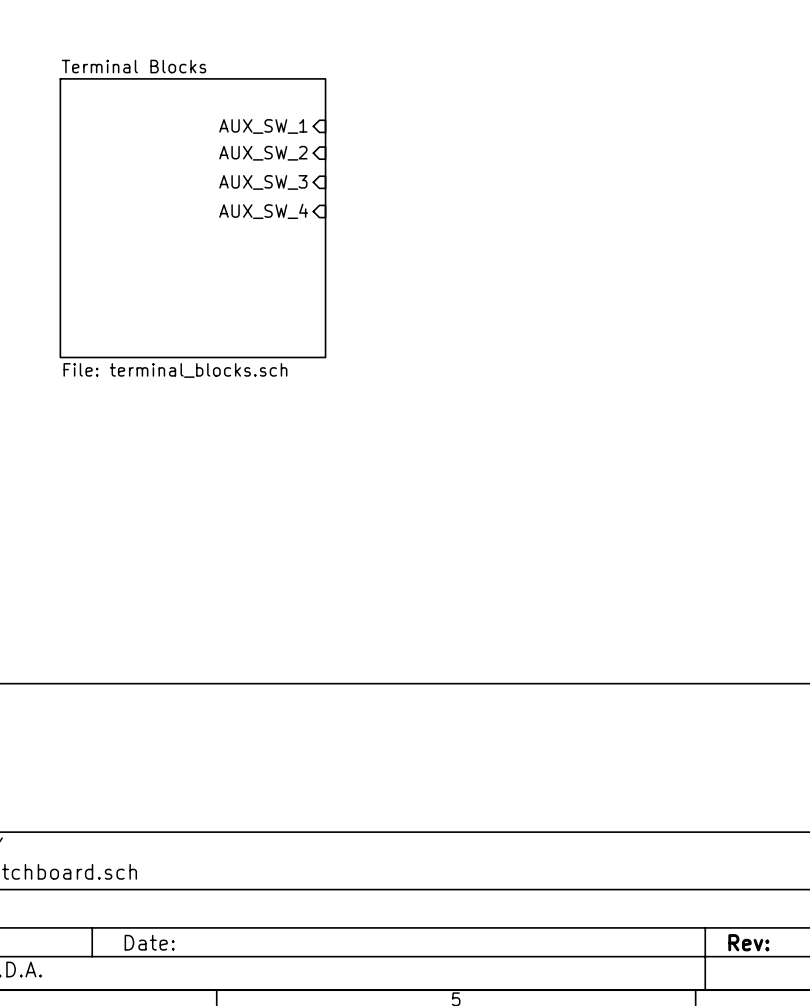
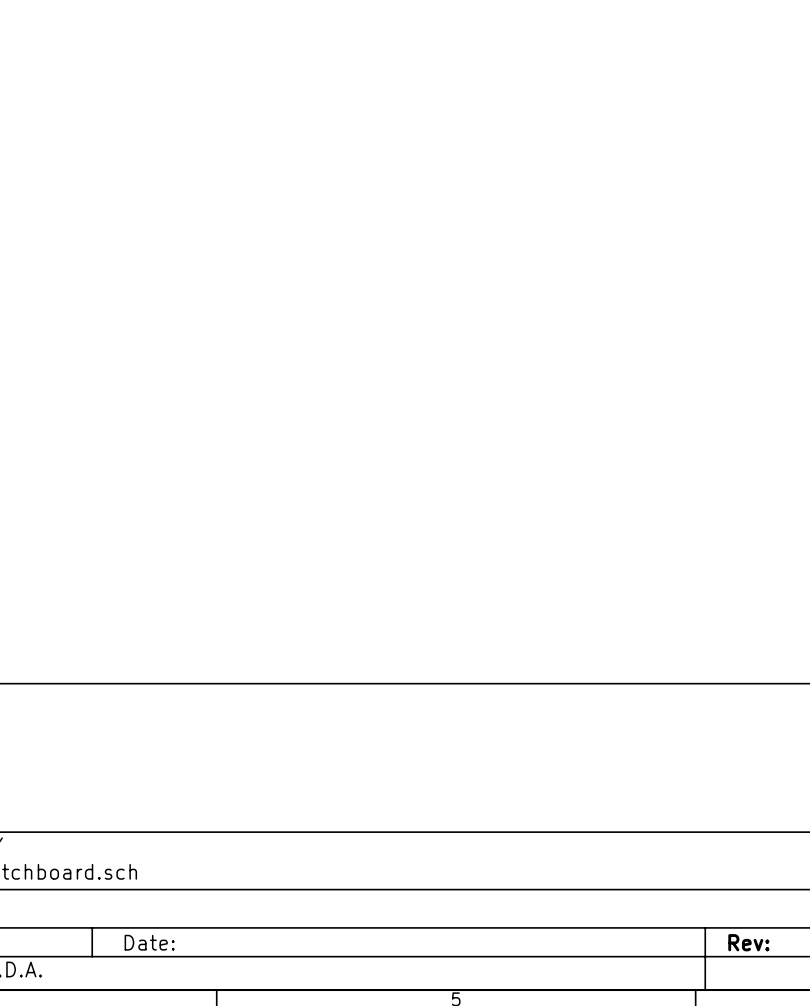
sheet pin: AUX_SW_1 (263, 126) -> none
sheet pin: AUX_SW_2 (263, 153) -> none
sheet pin: AUX_SW_3 (263, 182) -> none
sheet pin: AUX_SW_4 (263, 211) -> none
sheet Terminal Blocks: File: terminal_blocks.sch (192, 218) -> none

